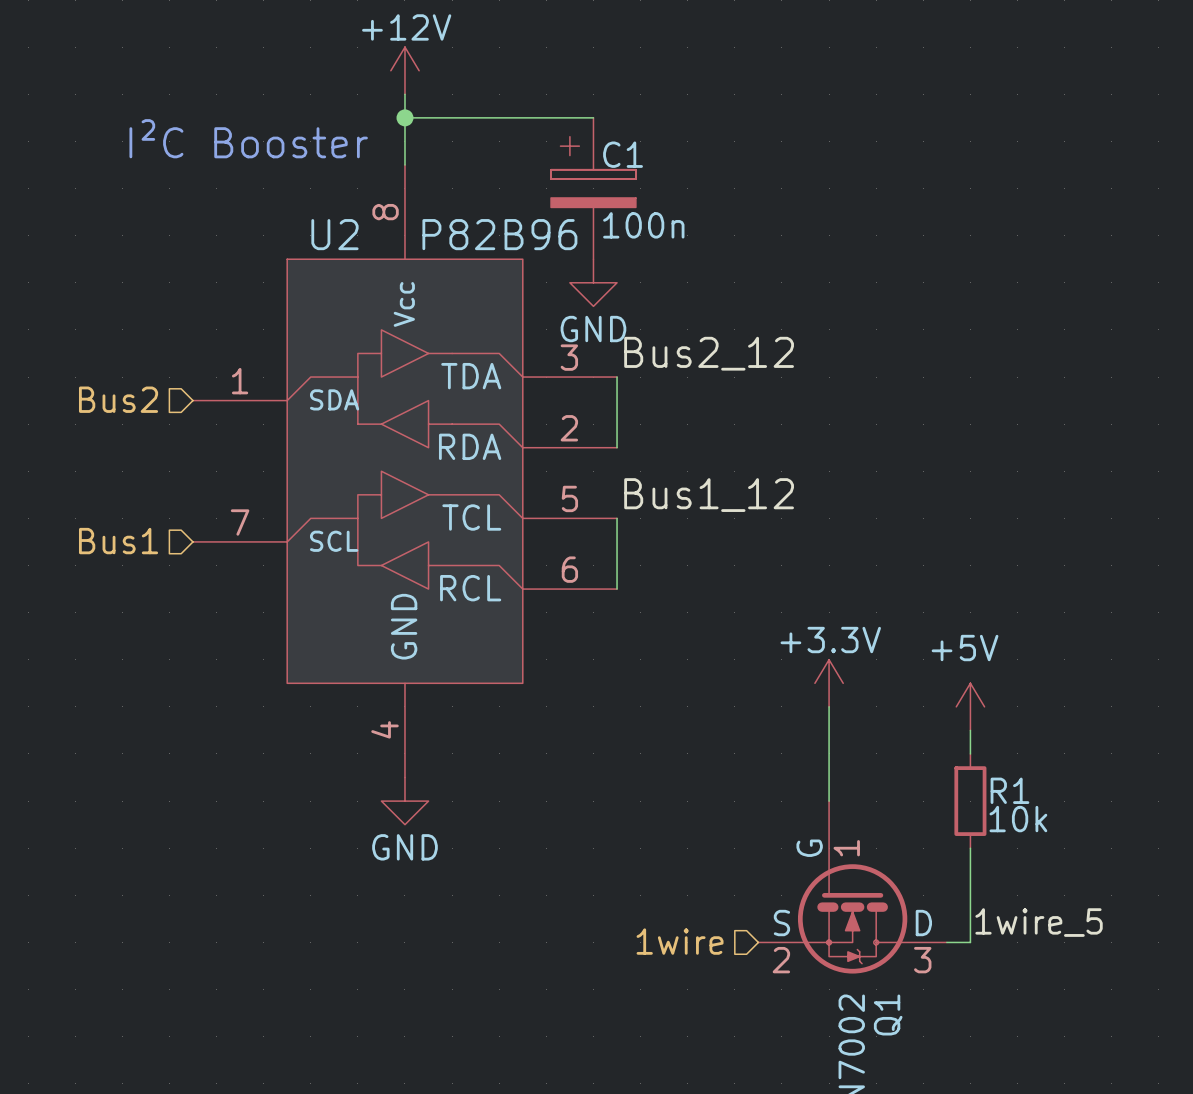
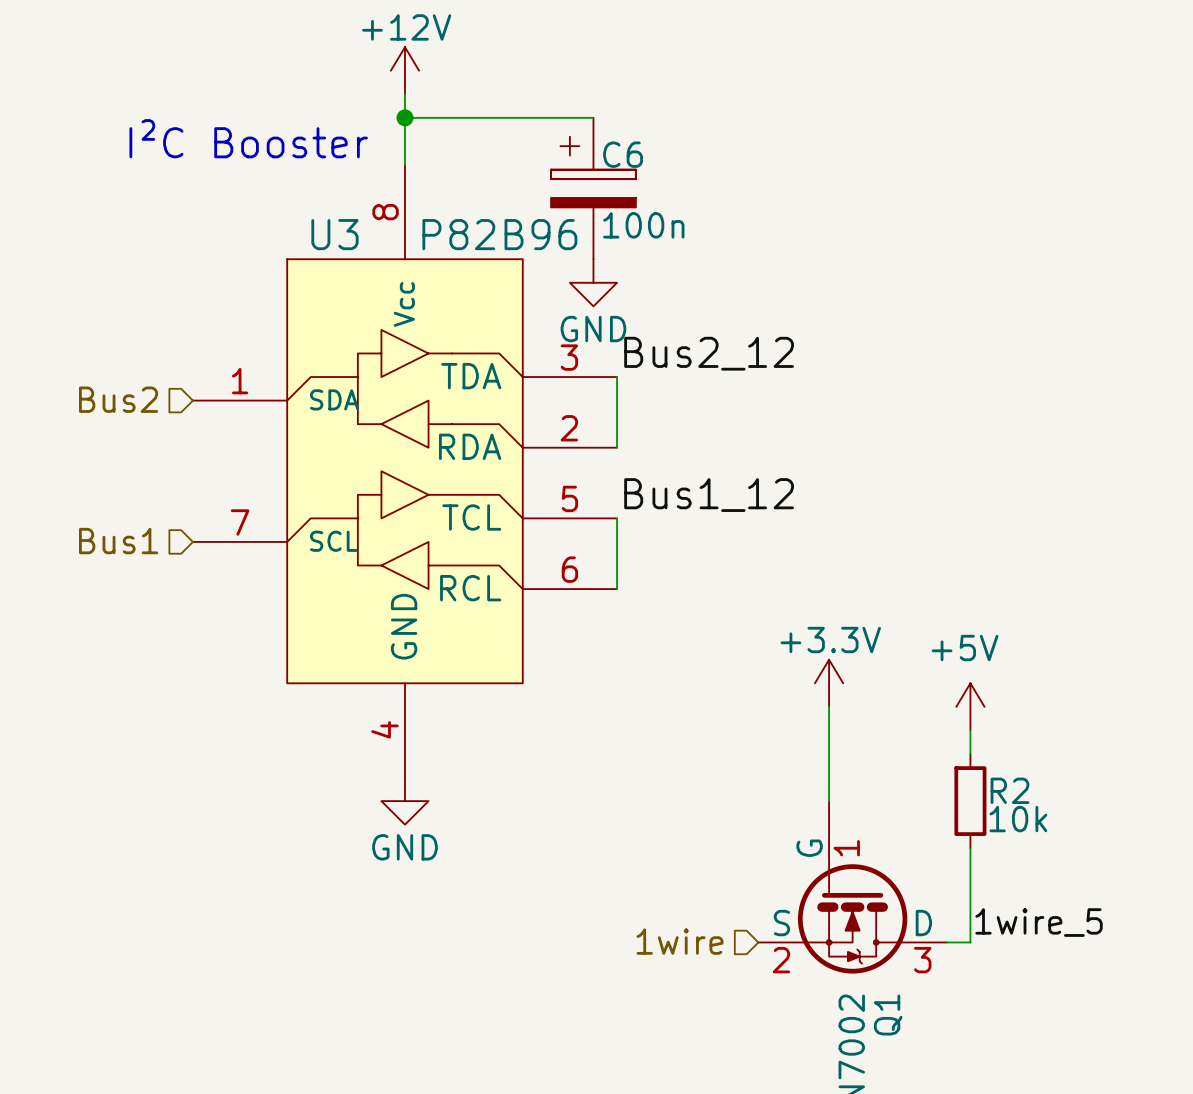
C1 name: C1 (623, 154) -> C6 (623, 154)
U2 name: U2 (334, 234) -> U3 (334, 234)
R1 name: R1 (1009, 790) -> R2 (1009, 790)

